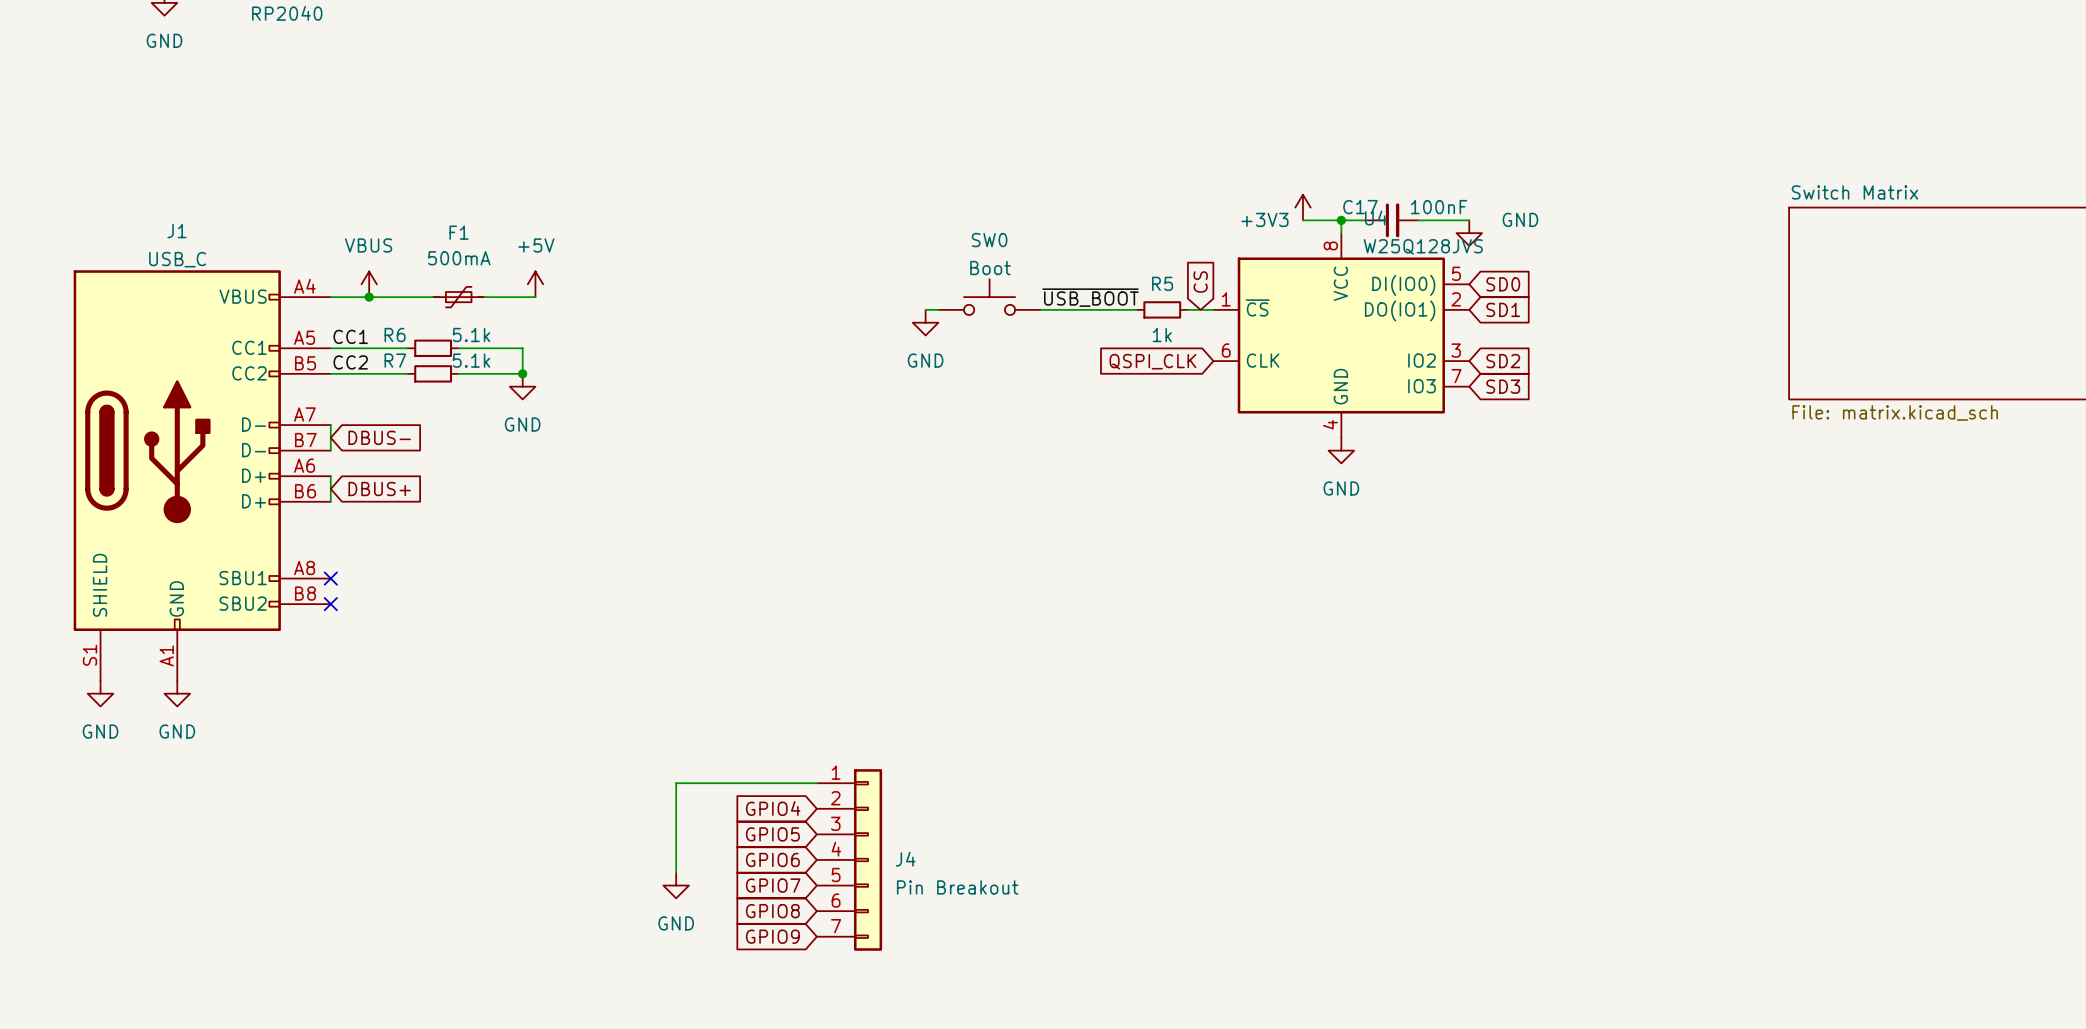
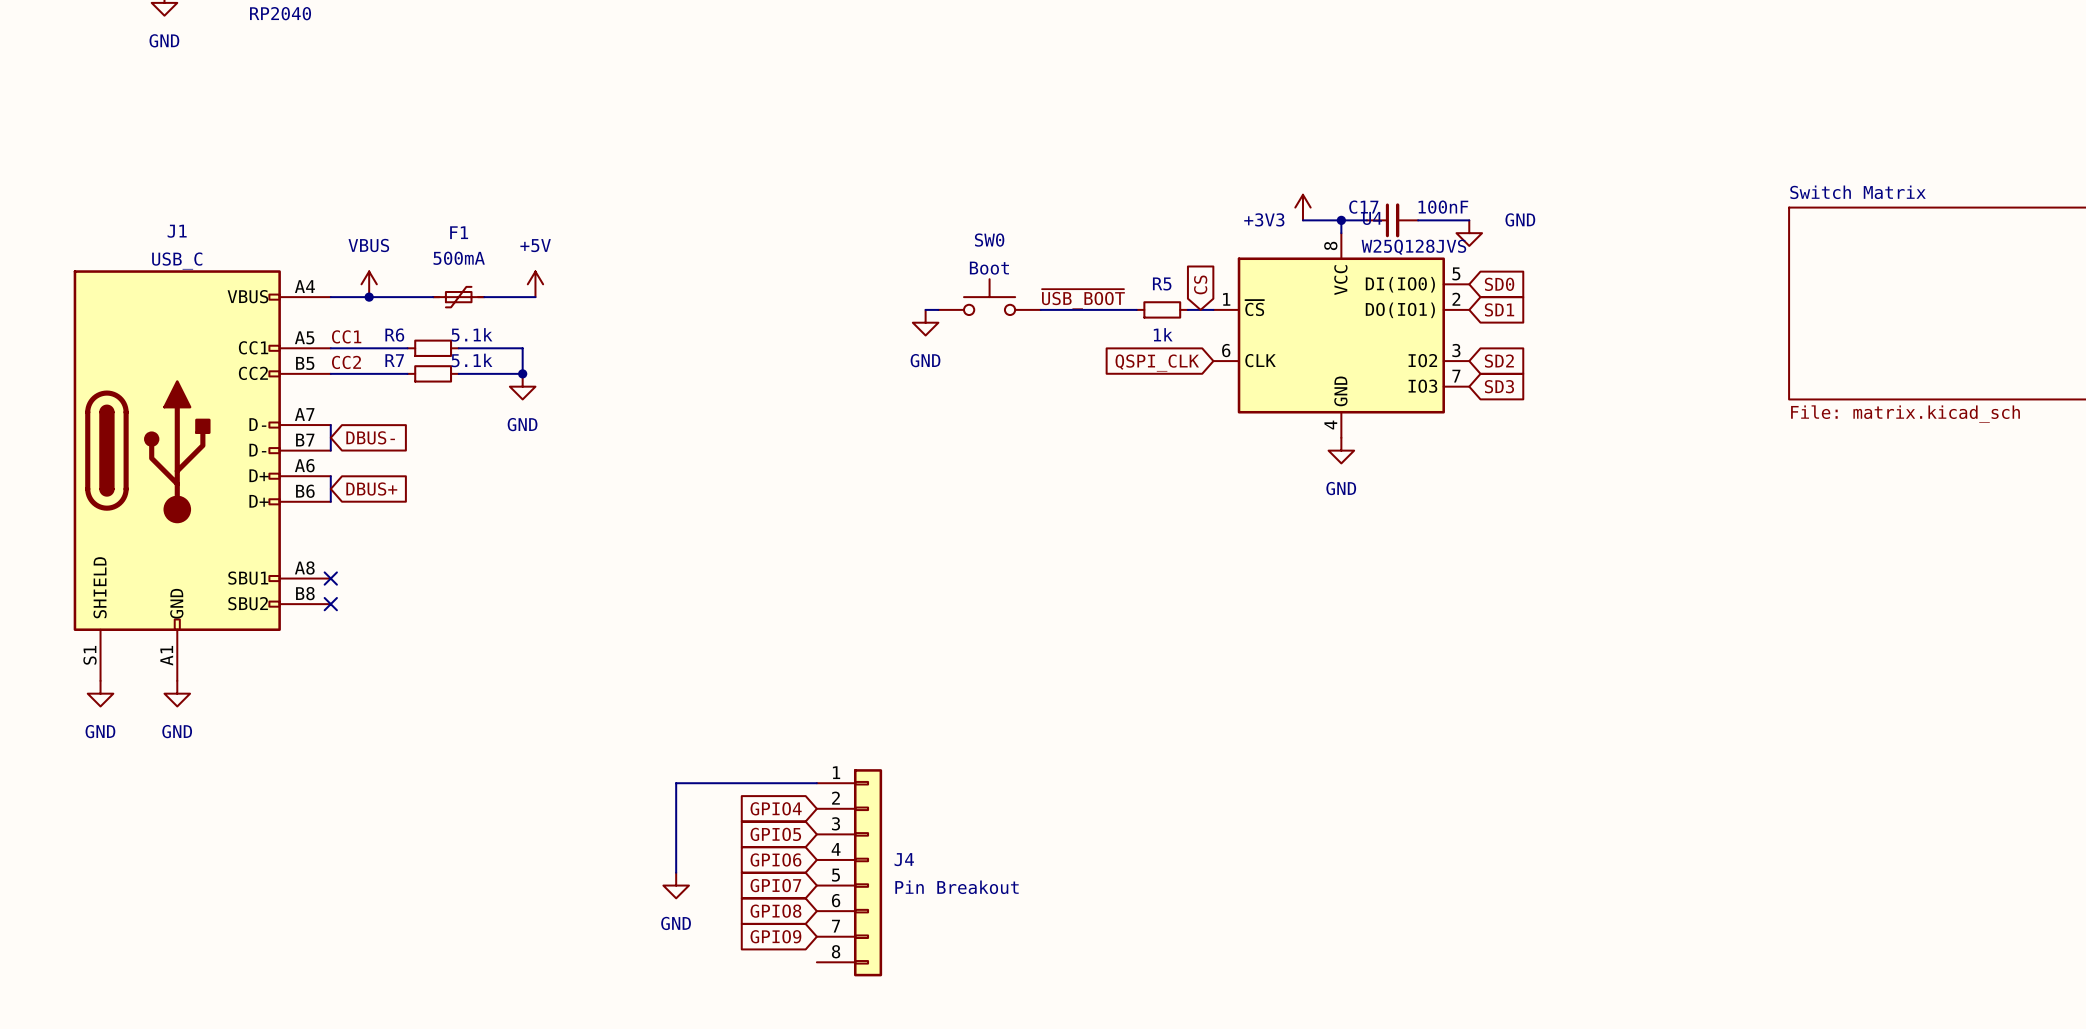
J4 symbol: [816, 769, 883, 951] -> [816, 769, 883, 977]

